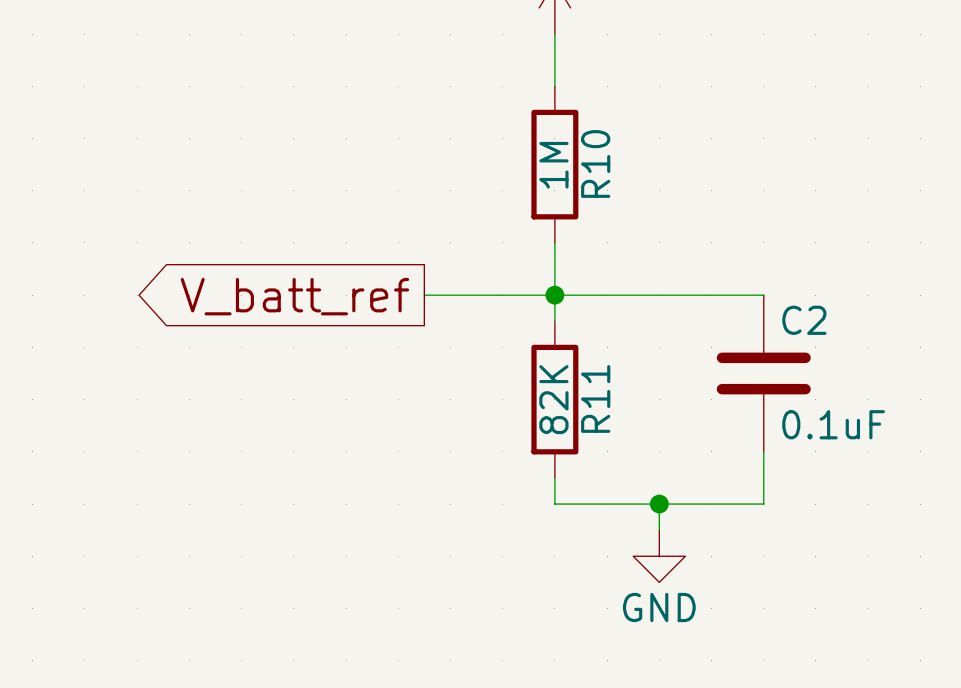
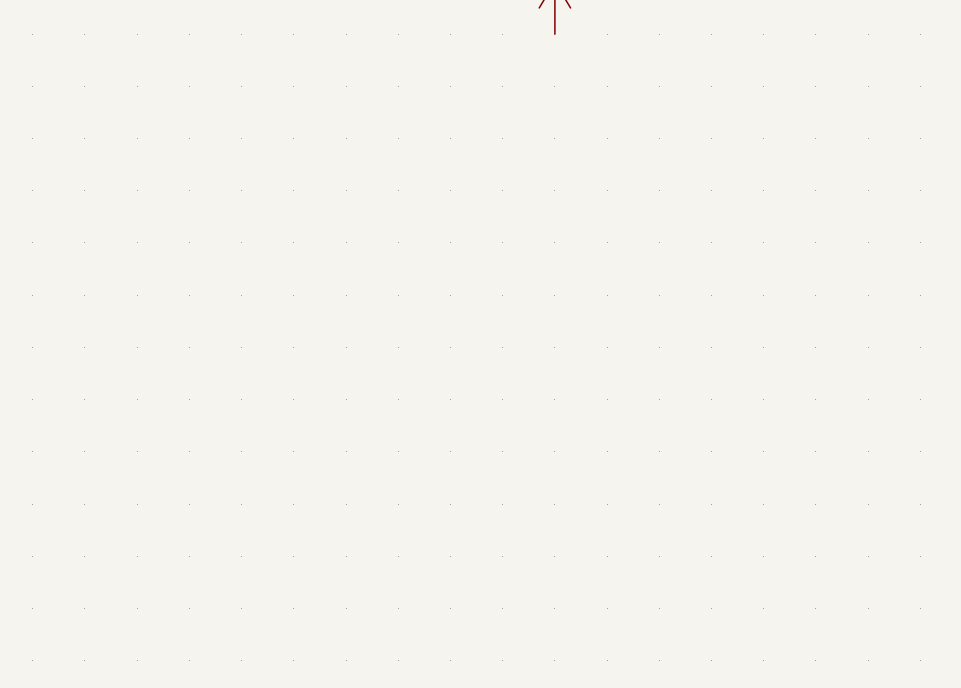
wire: (554, 34) (554, 86) -> none
R10: 1M (554, 164) -> none
wire: (554, 242) (554, 321) -> none
wire: (424, 295) (763, 295) -> none
junction: (554, 295) -> none
global label: V_batt_ref (294, 296) -> none
C2: 0.1uF (763, 373) -> none
R11: 82K (554, 399) -> none
wire: (763, 451) (763, 504) (554, 504) (554, 477) -> none
wire: (659, 504) (659, 530) -> none
junction: (659, 504) -> none
power symbol: GND (659, 556) -> none

